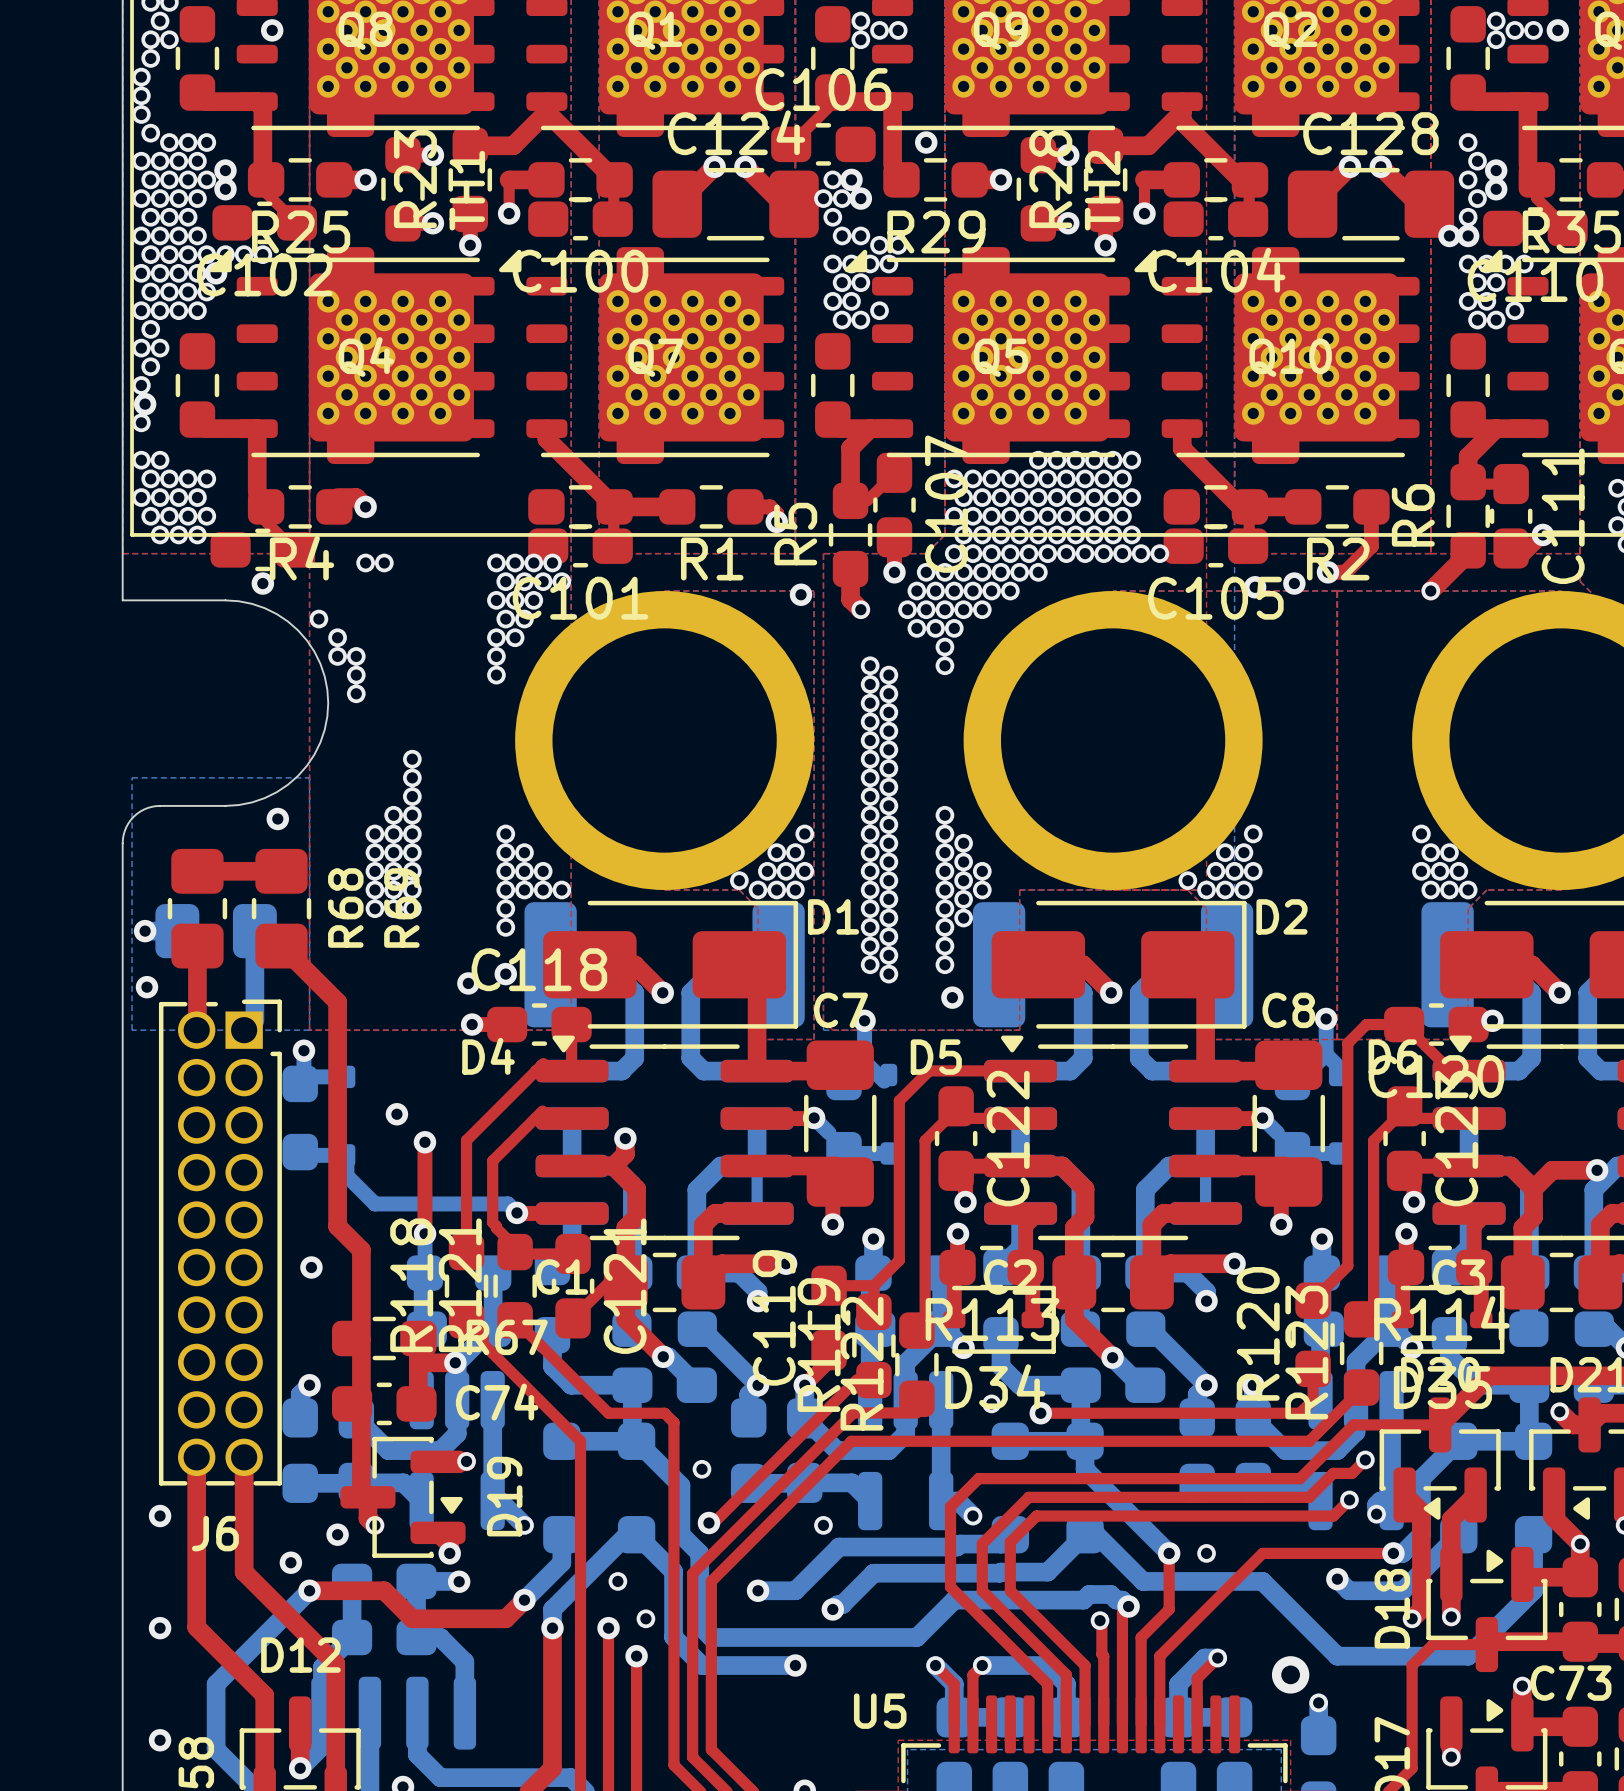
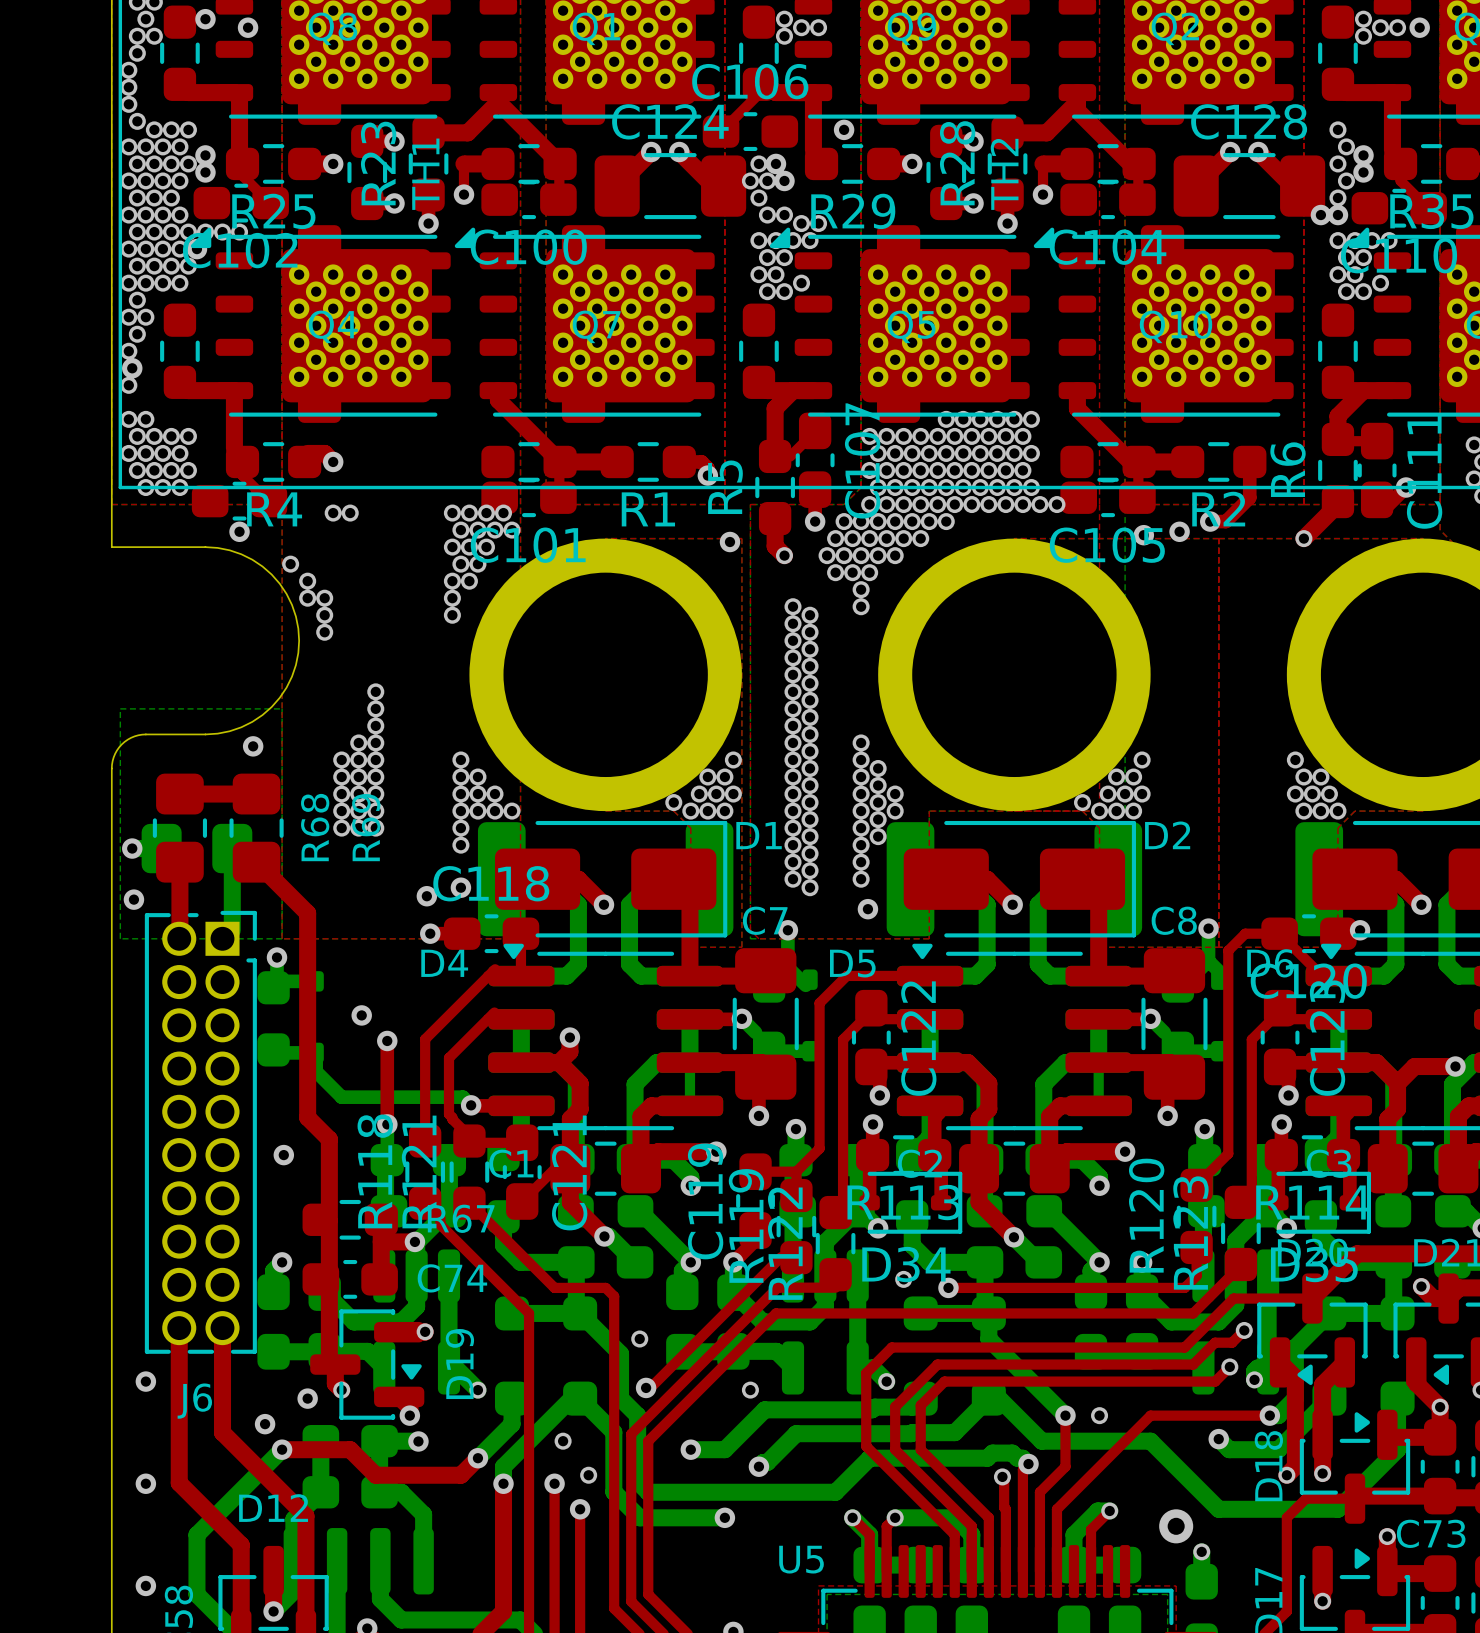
via: none -> (205, 19)

